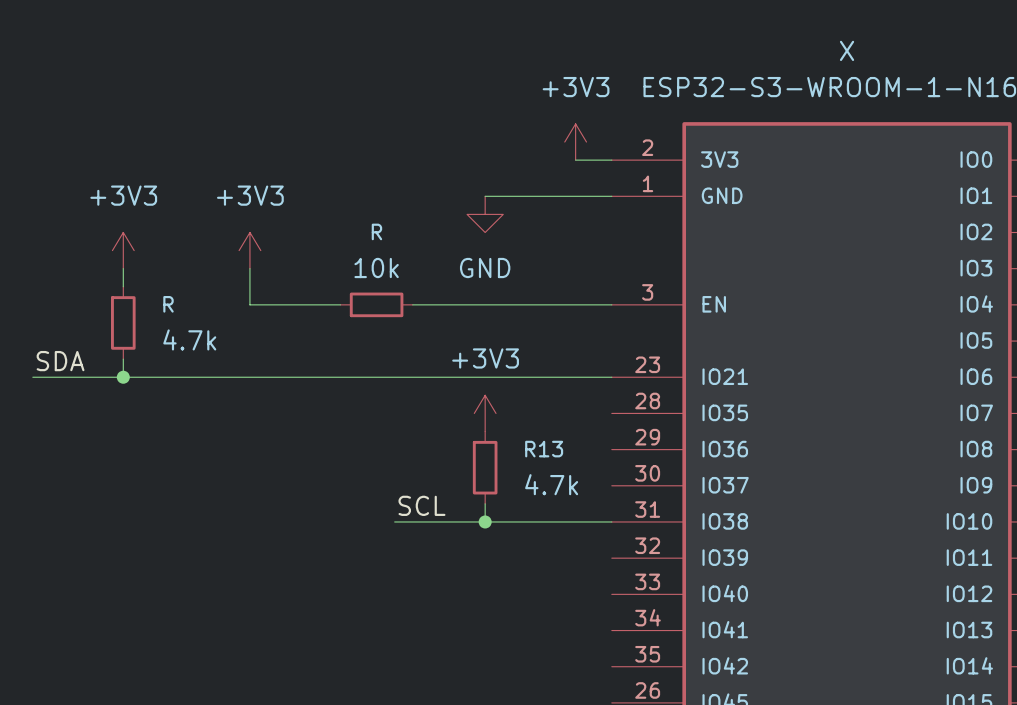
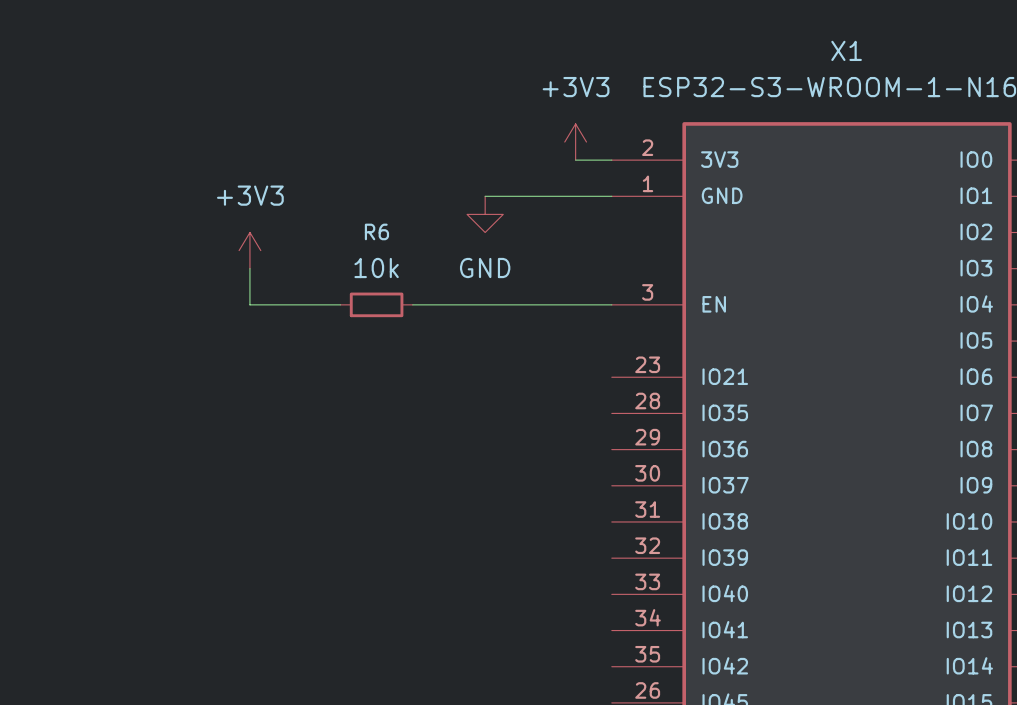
X name: X (847, 50) -> X1 (846, 50)
R name: R (376, 231) -> R6 (376, 231)
power symbol: +3V3 (123, 250) -> none
wire: (123, 268) (123, 286) -> none
R: 4.7k (123, 322) -> none
wire: (123, 359) (123, 377) -> none
label: SDA (60, 361) -> none
wire: (32, 377) (611, 377) -> none
junction: (123, 377) -> none
power symbol: +3V3 (485, 413) -> none
R13: 4.7k (485, 467) -> none
wire: (485, 503) (485, 521) -> none
label: SCL (421, 505) -> none
wire: (394, 521) (611, 521) -> none
junction: (485, 521) -> none

